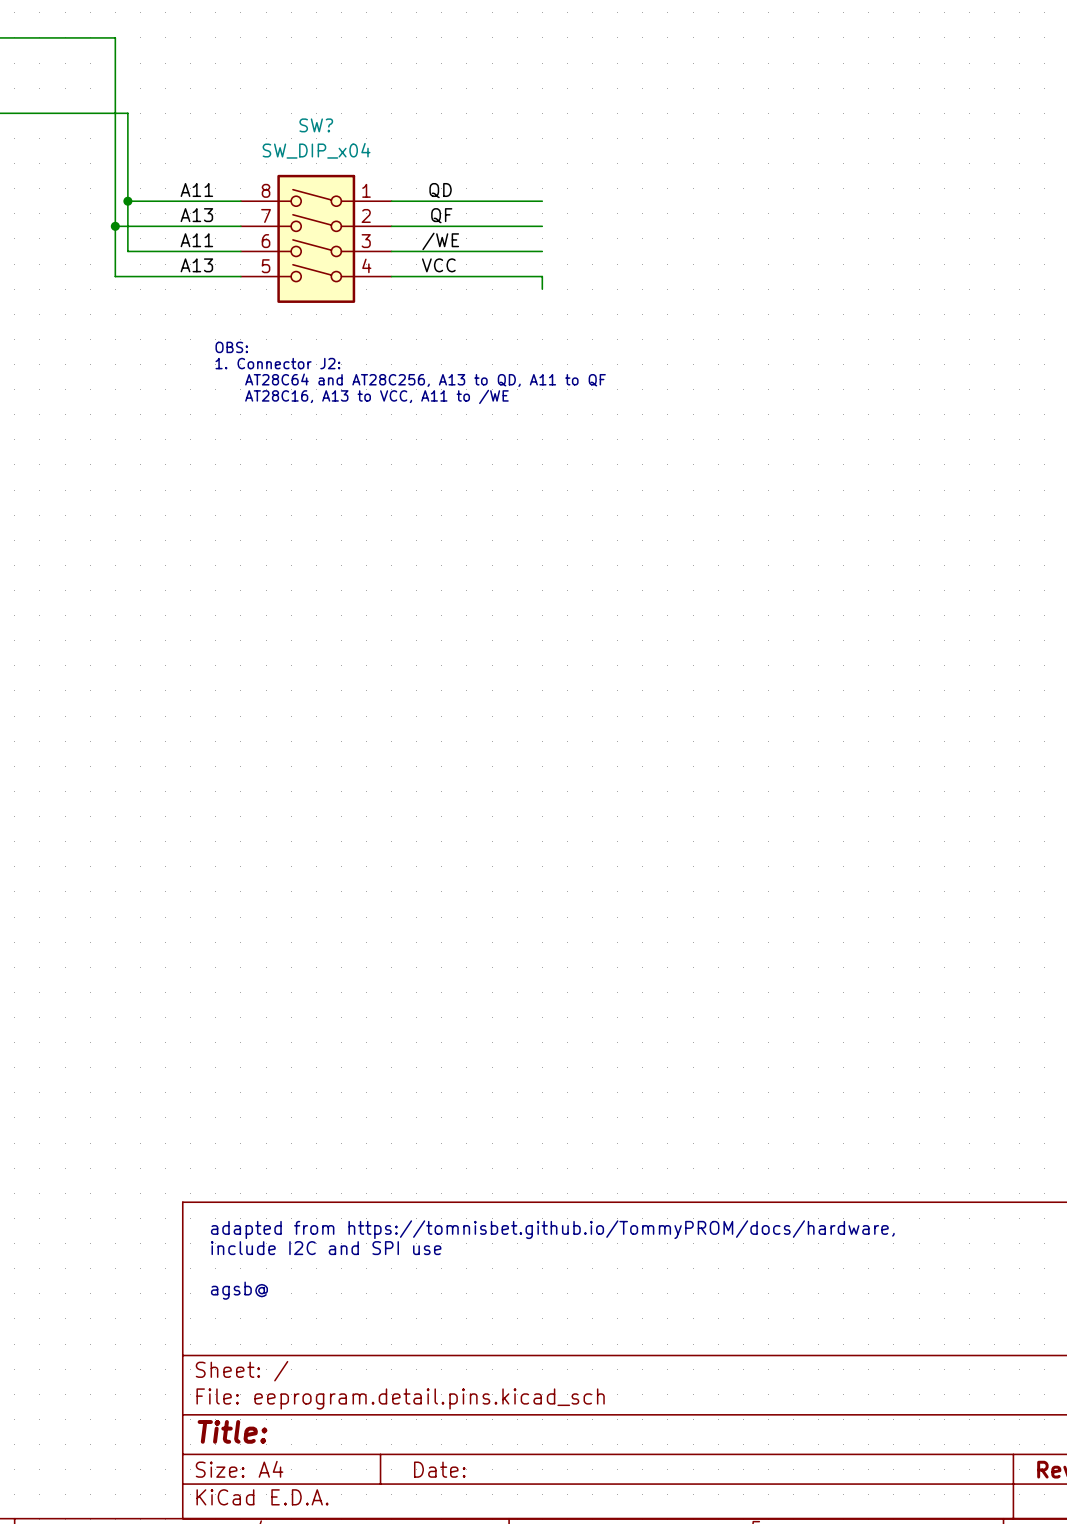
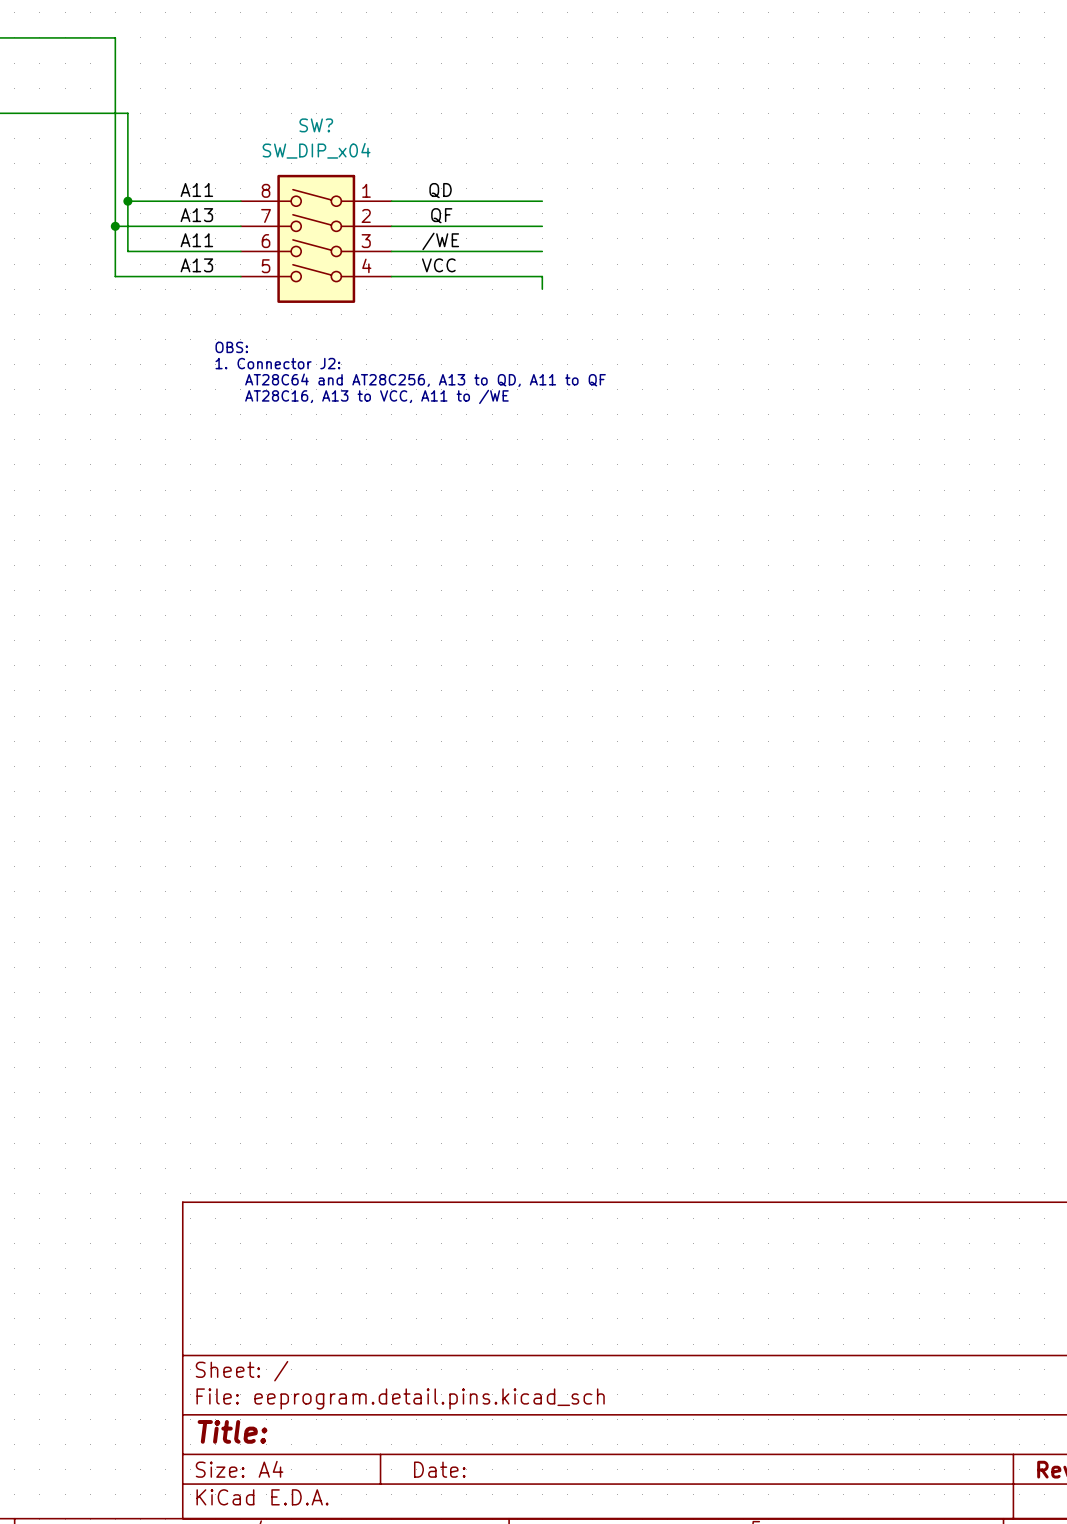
text: adapted from https://tomnisbet.github.io/TommyPROM/docs/hardware, (552, 1229) -> none
text: include I2C and SPI use (326, 1248) -> none
text: agsb@ (239, 1290) -> none

